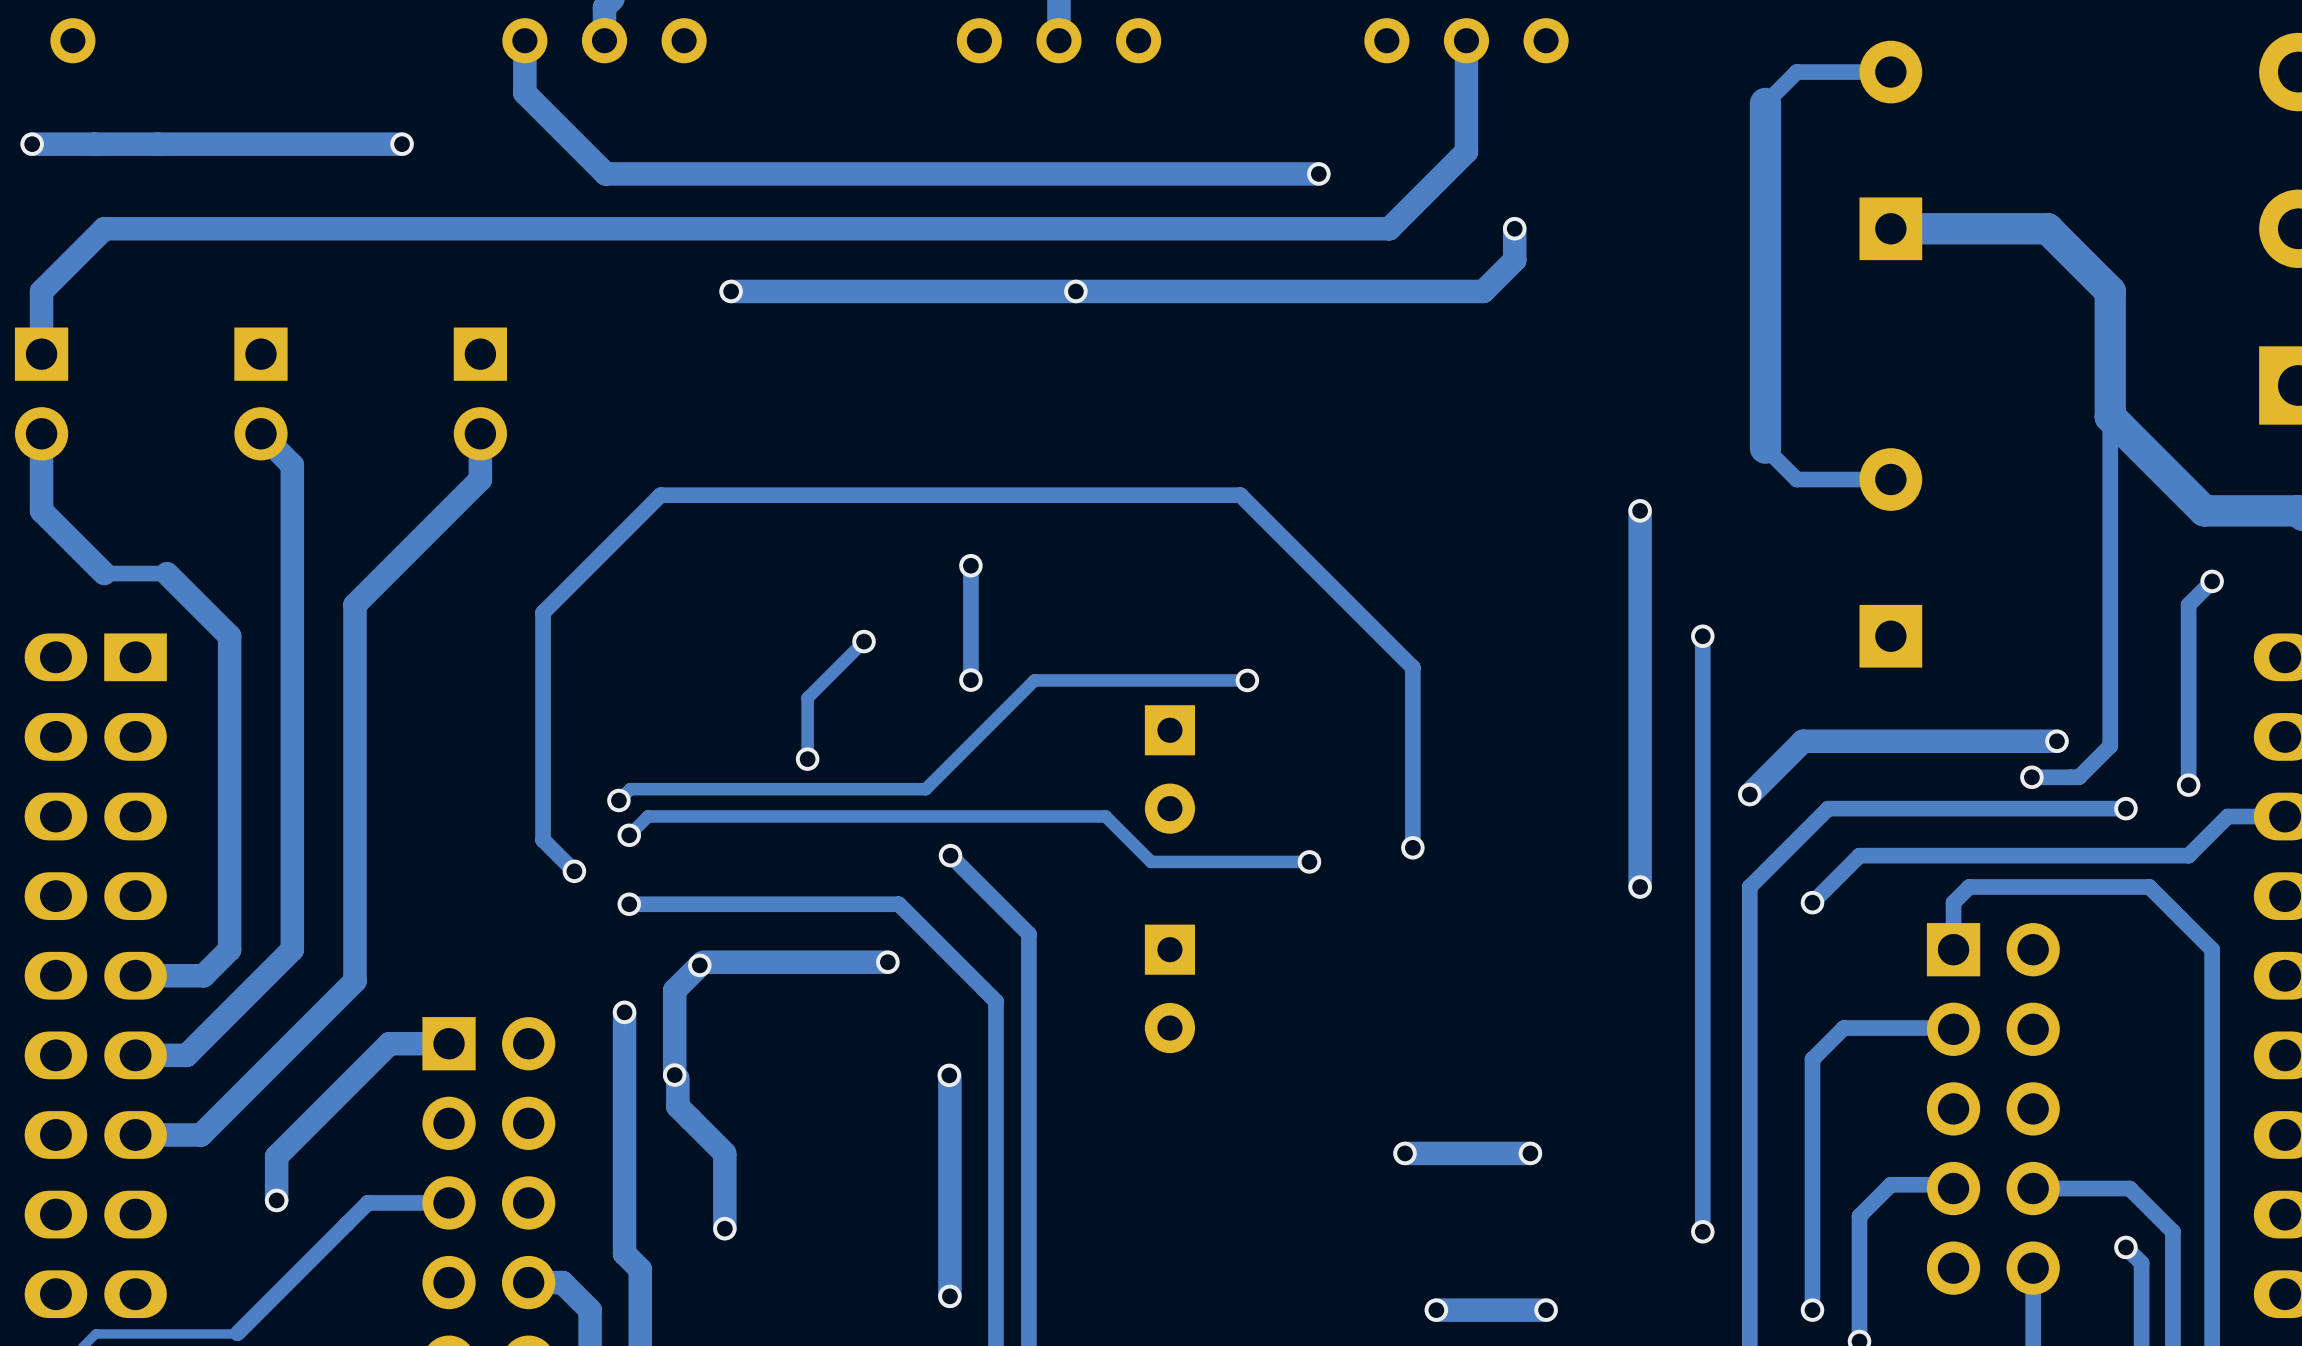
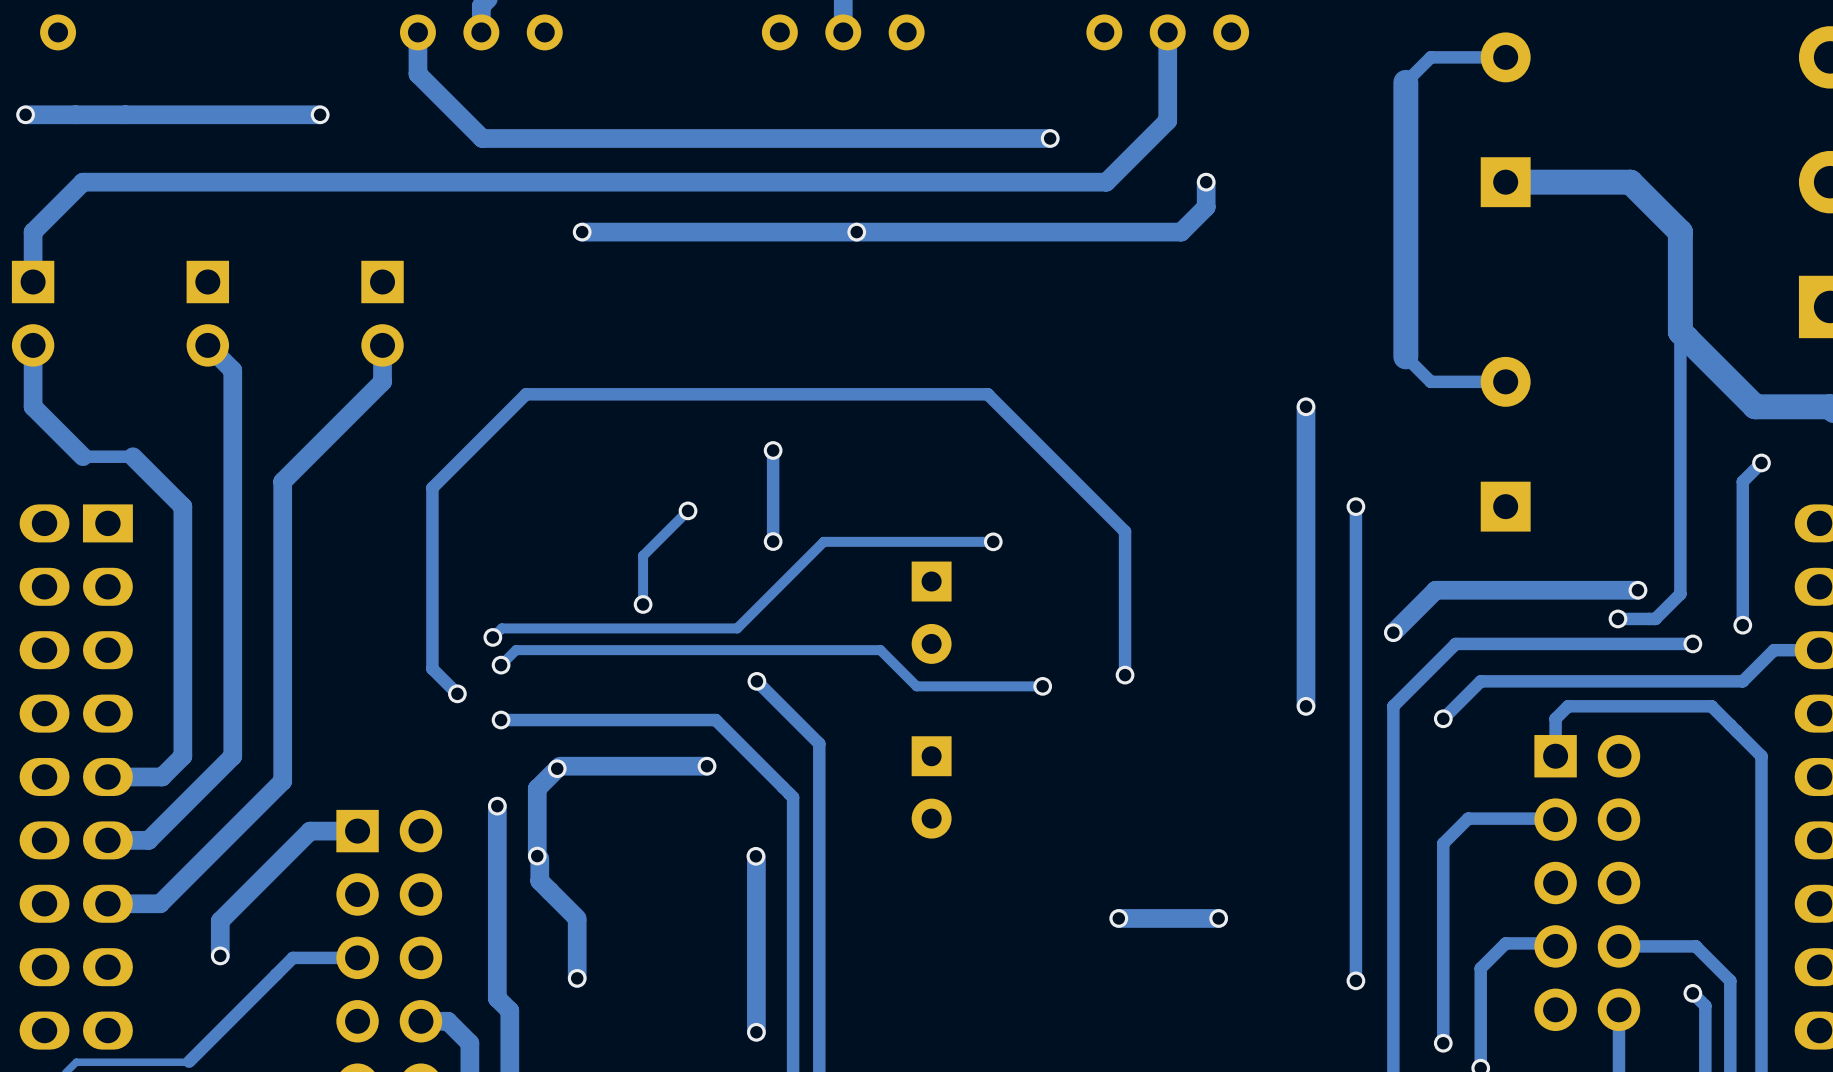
via: (1436, 1310) -> none
track: (1546, 1310) (1436, 1310) -> none
via: (1546, 1310) -> none

